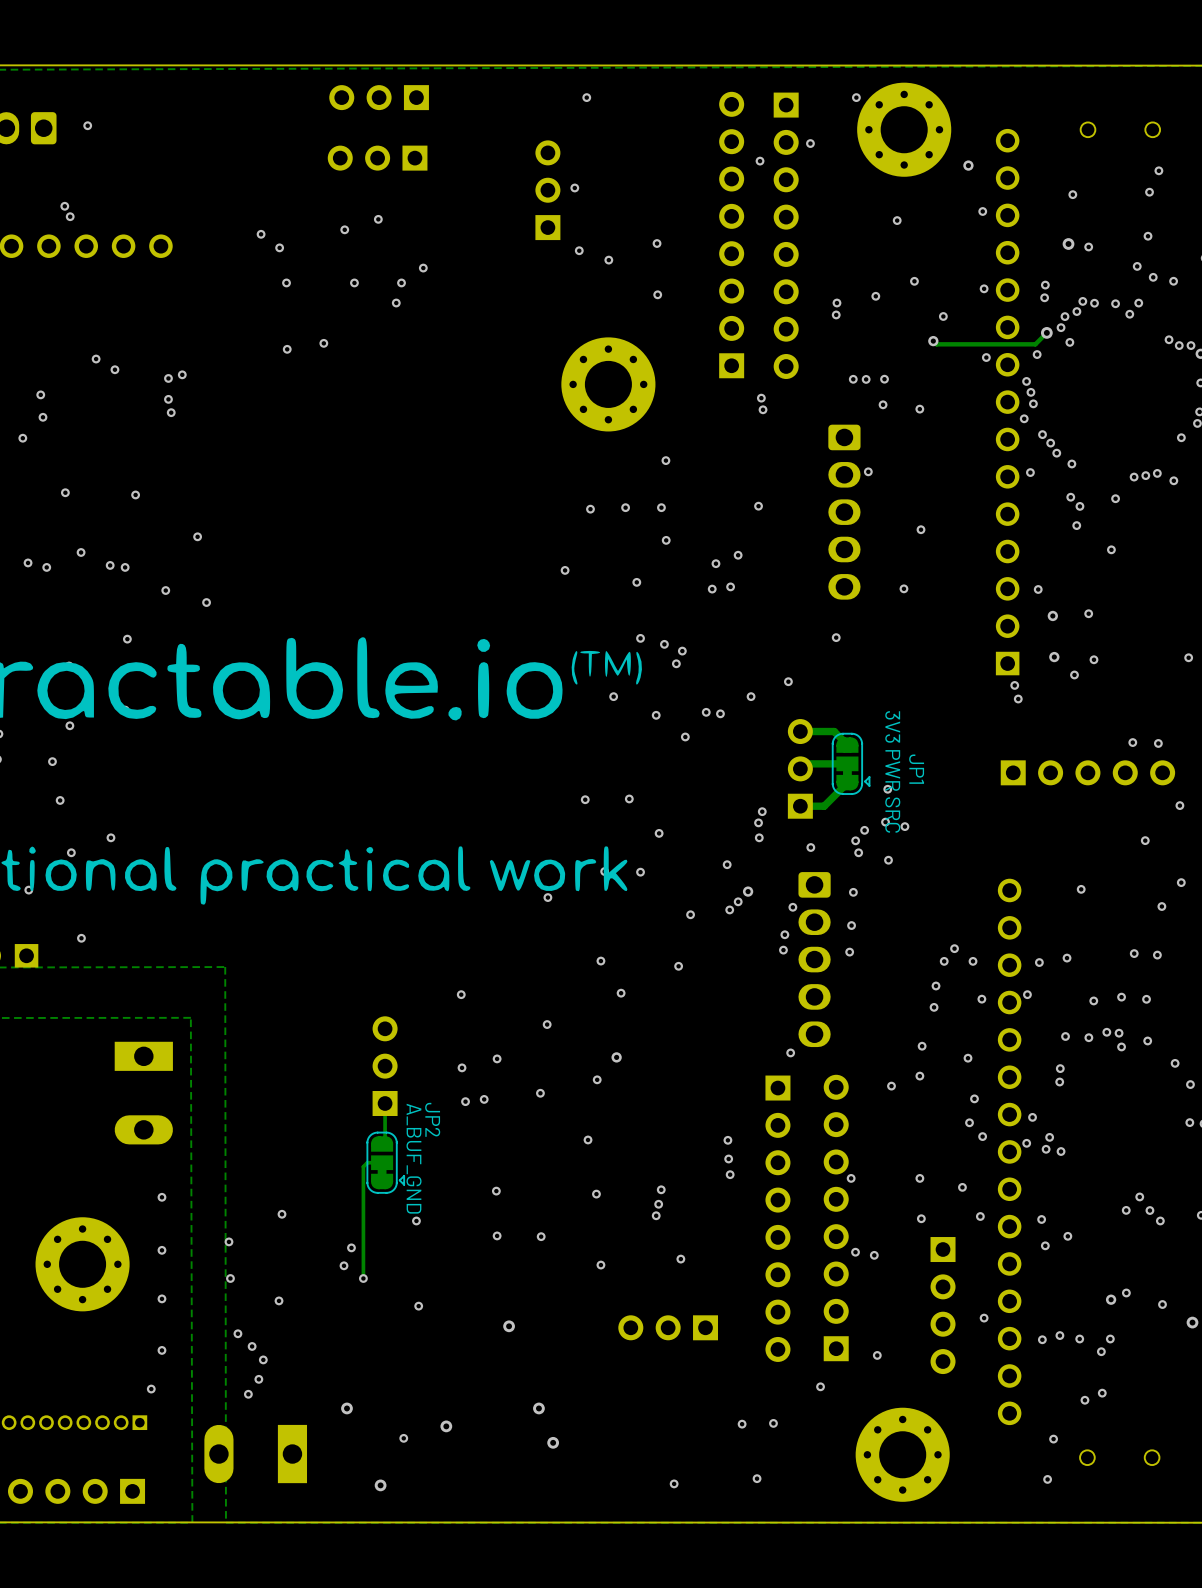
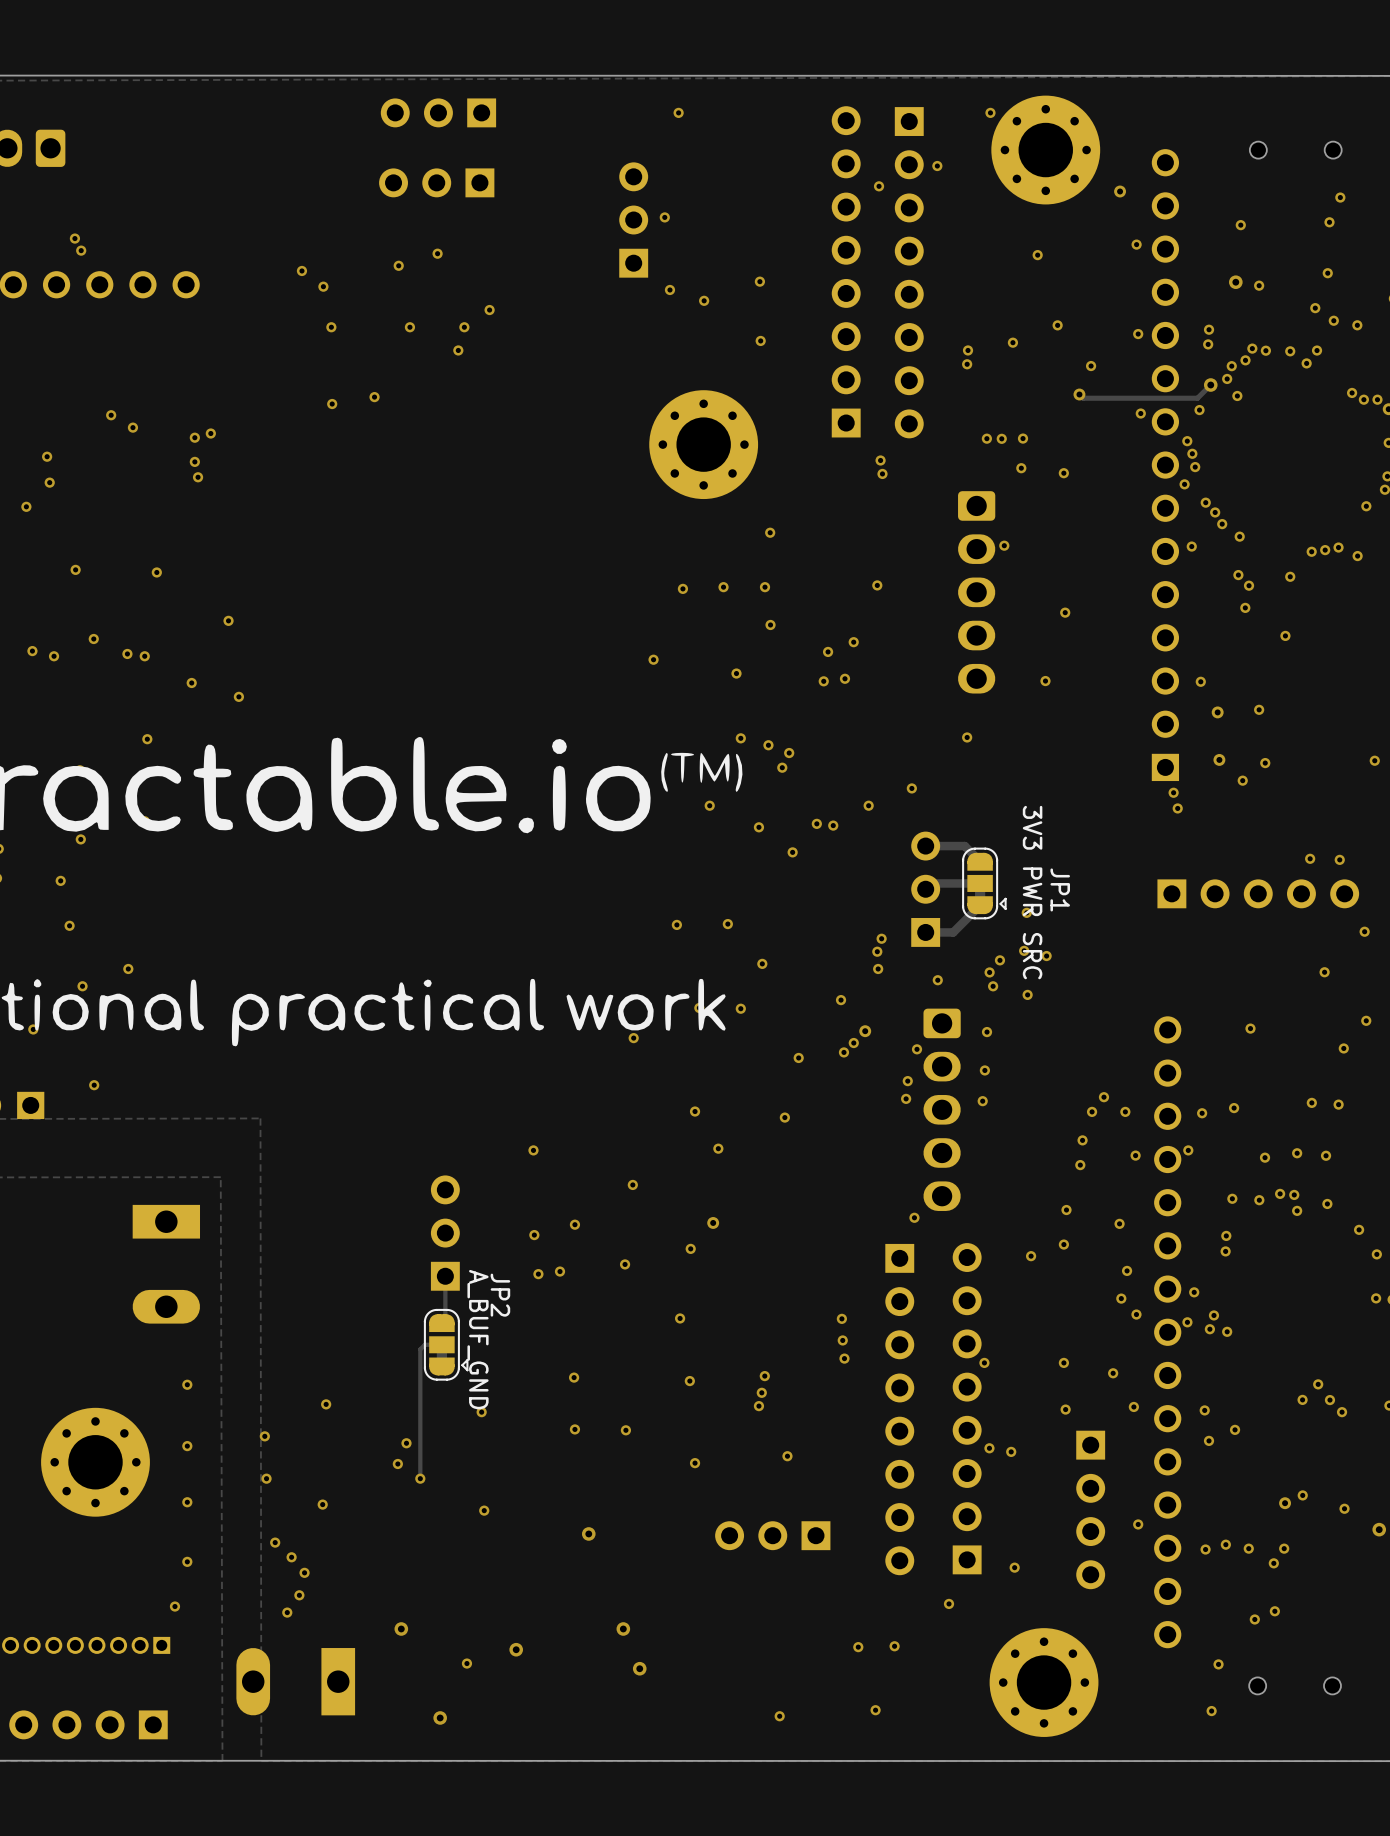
via: (87, 125) -> none

